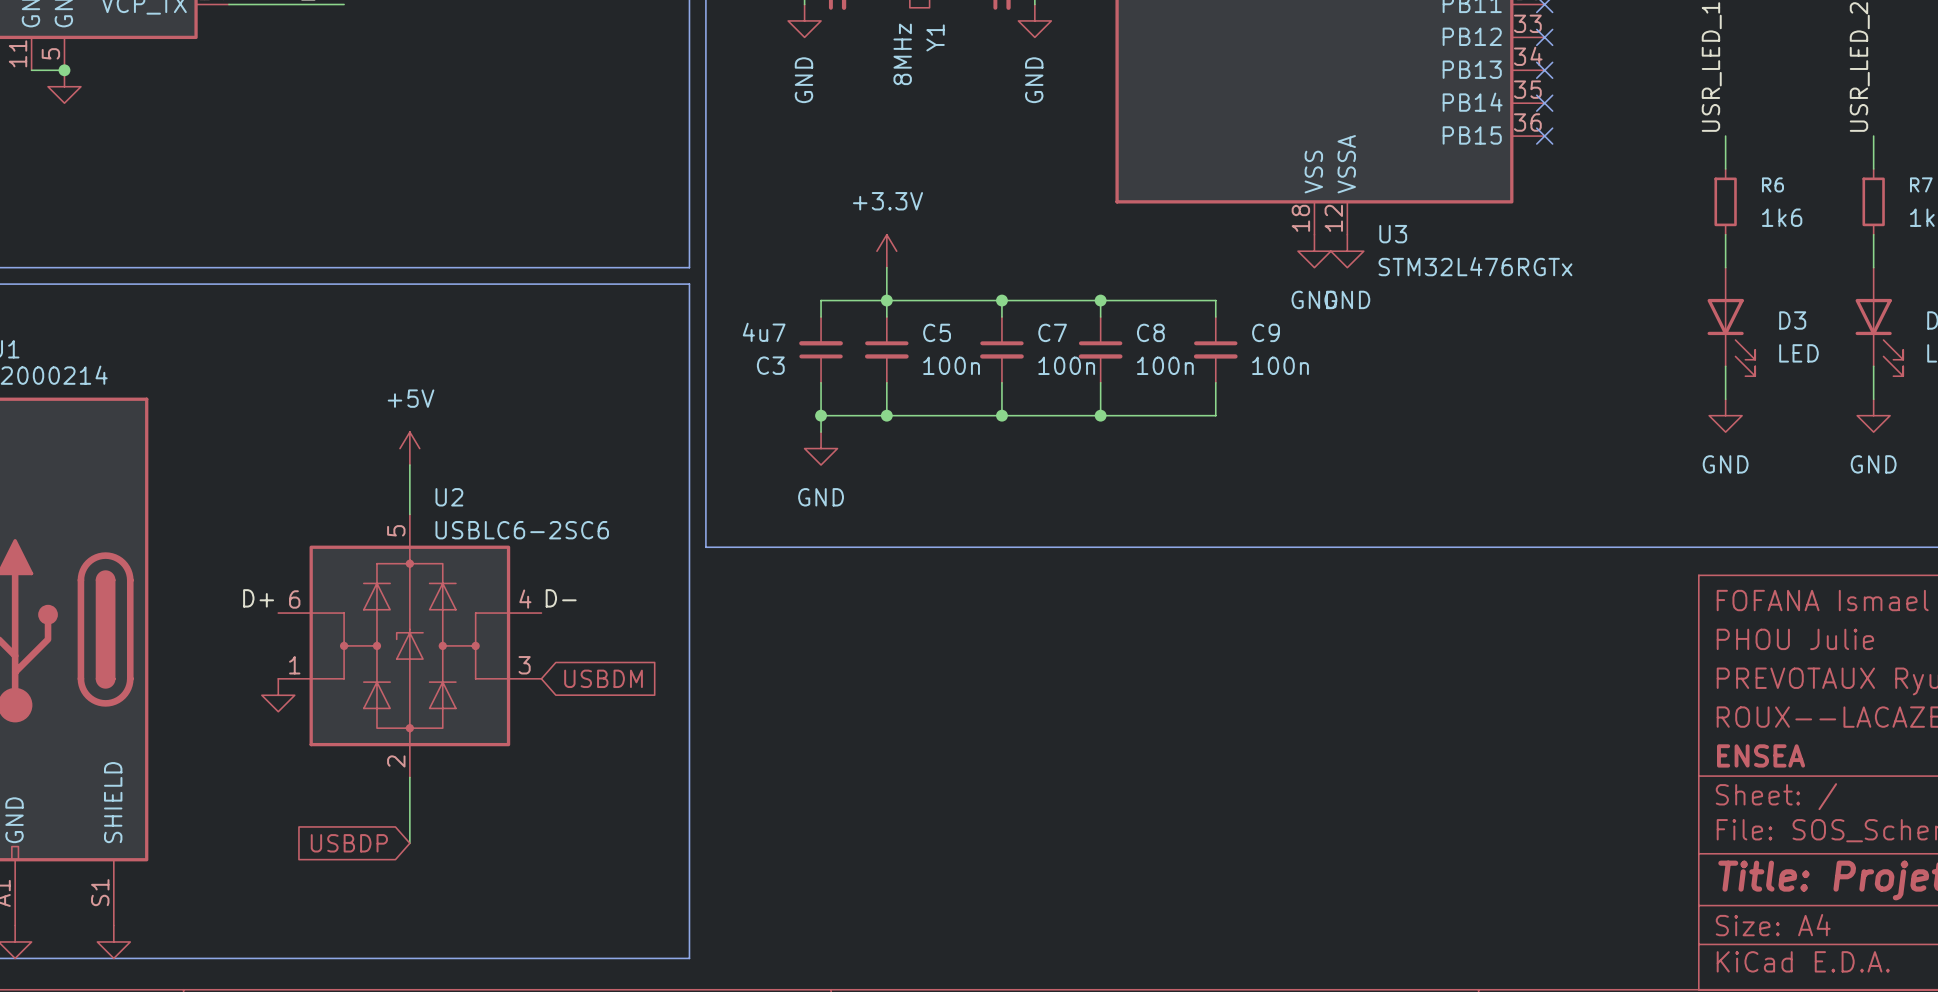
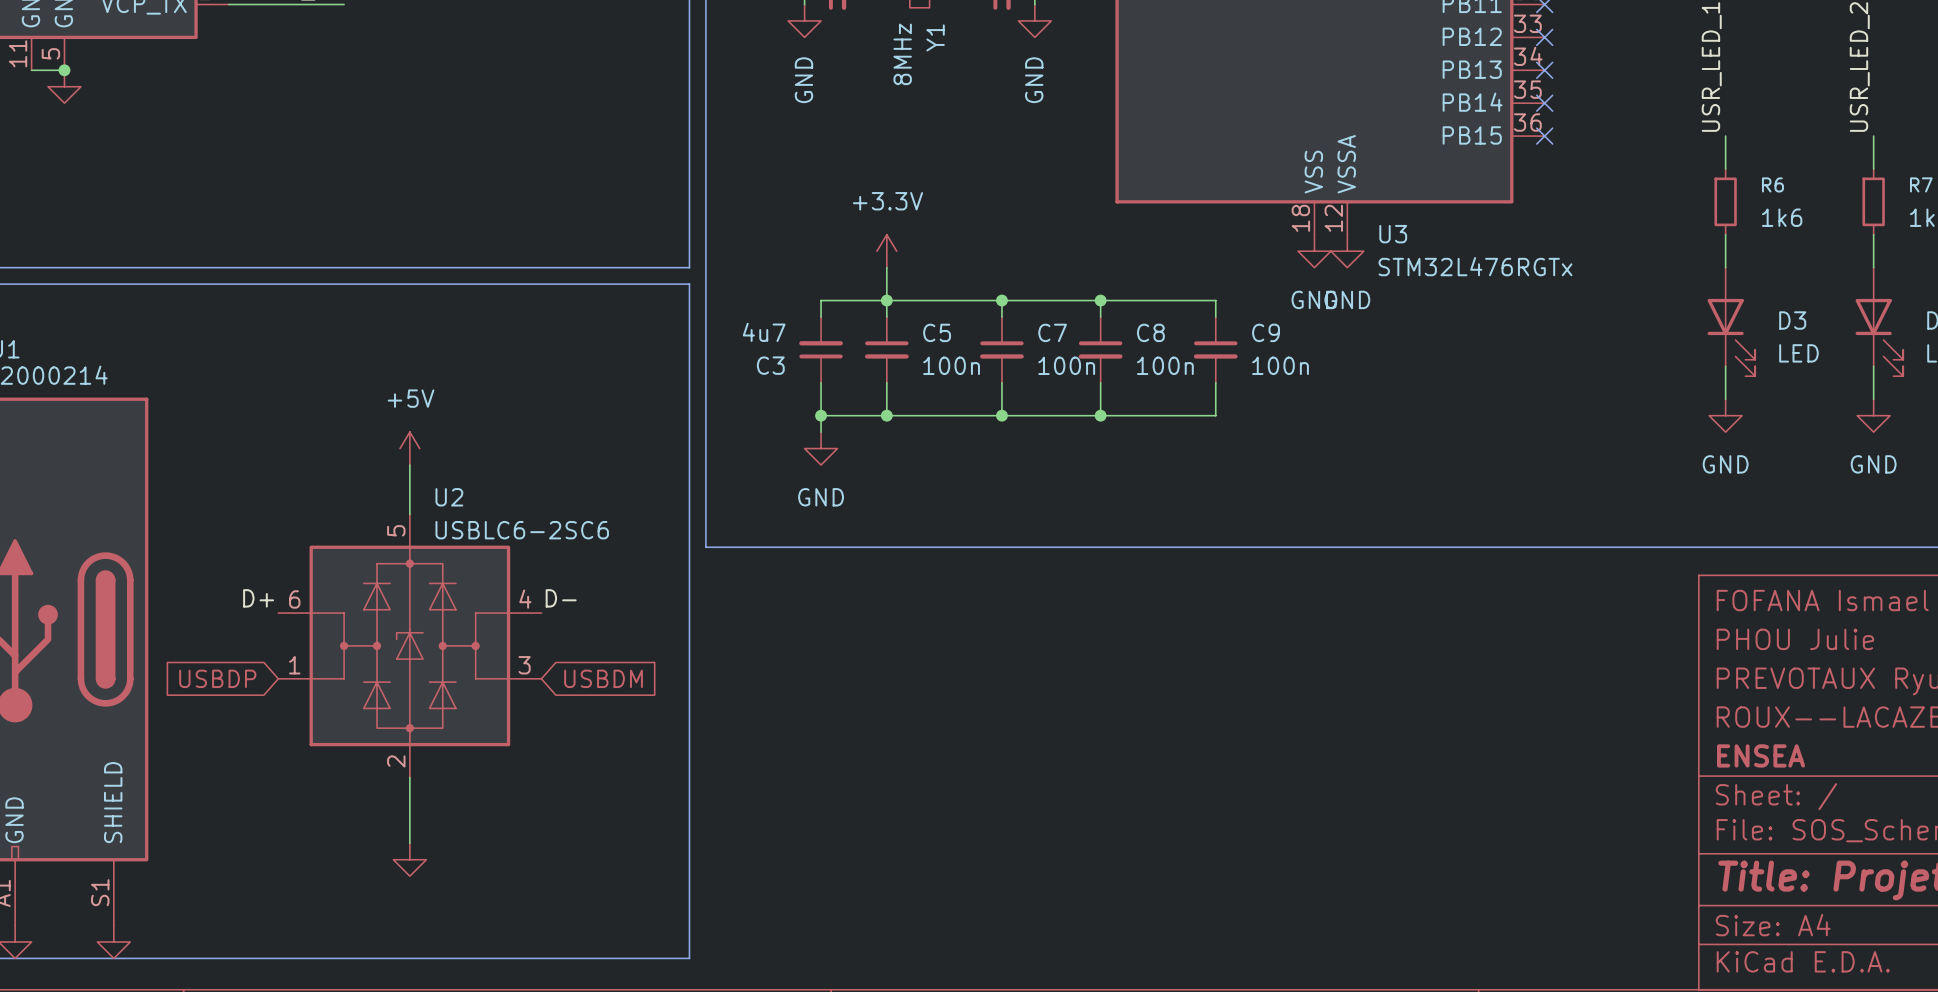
power symbol position: (278, 695) -> (409, 859)
global label position: USBDP (349, 843) -> USBDP (217, 678)

